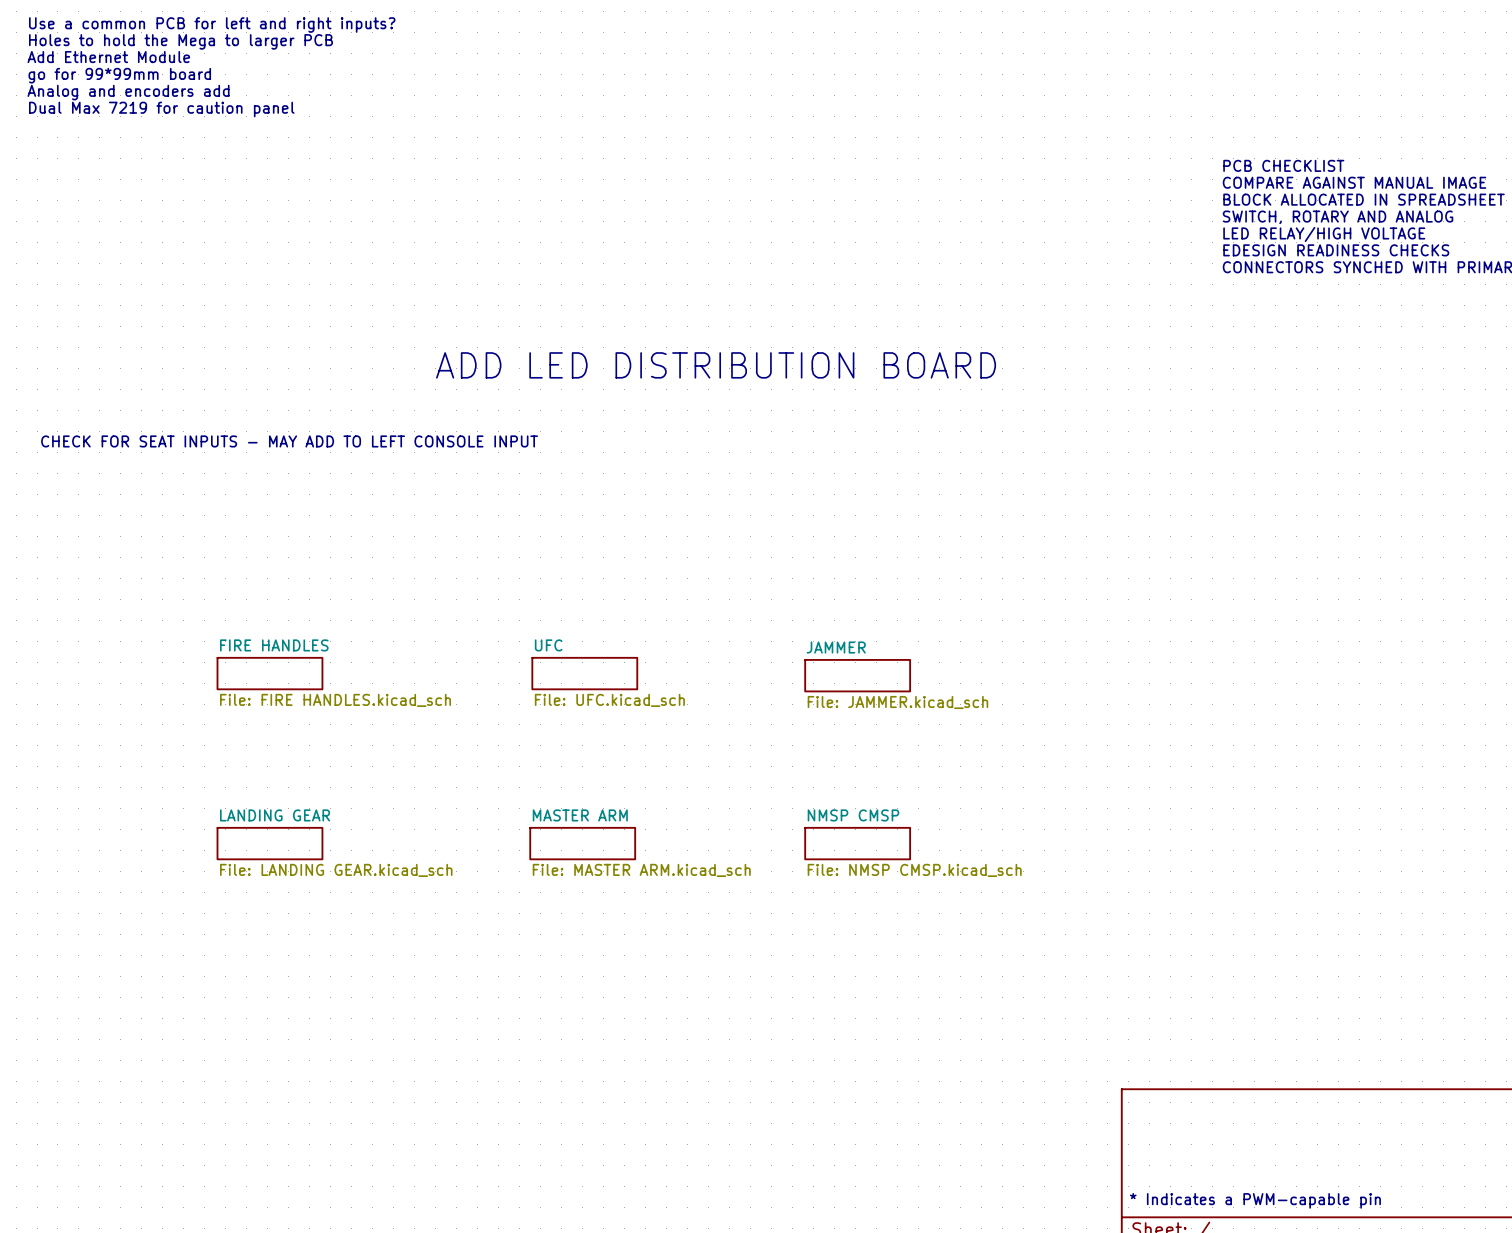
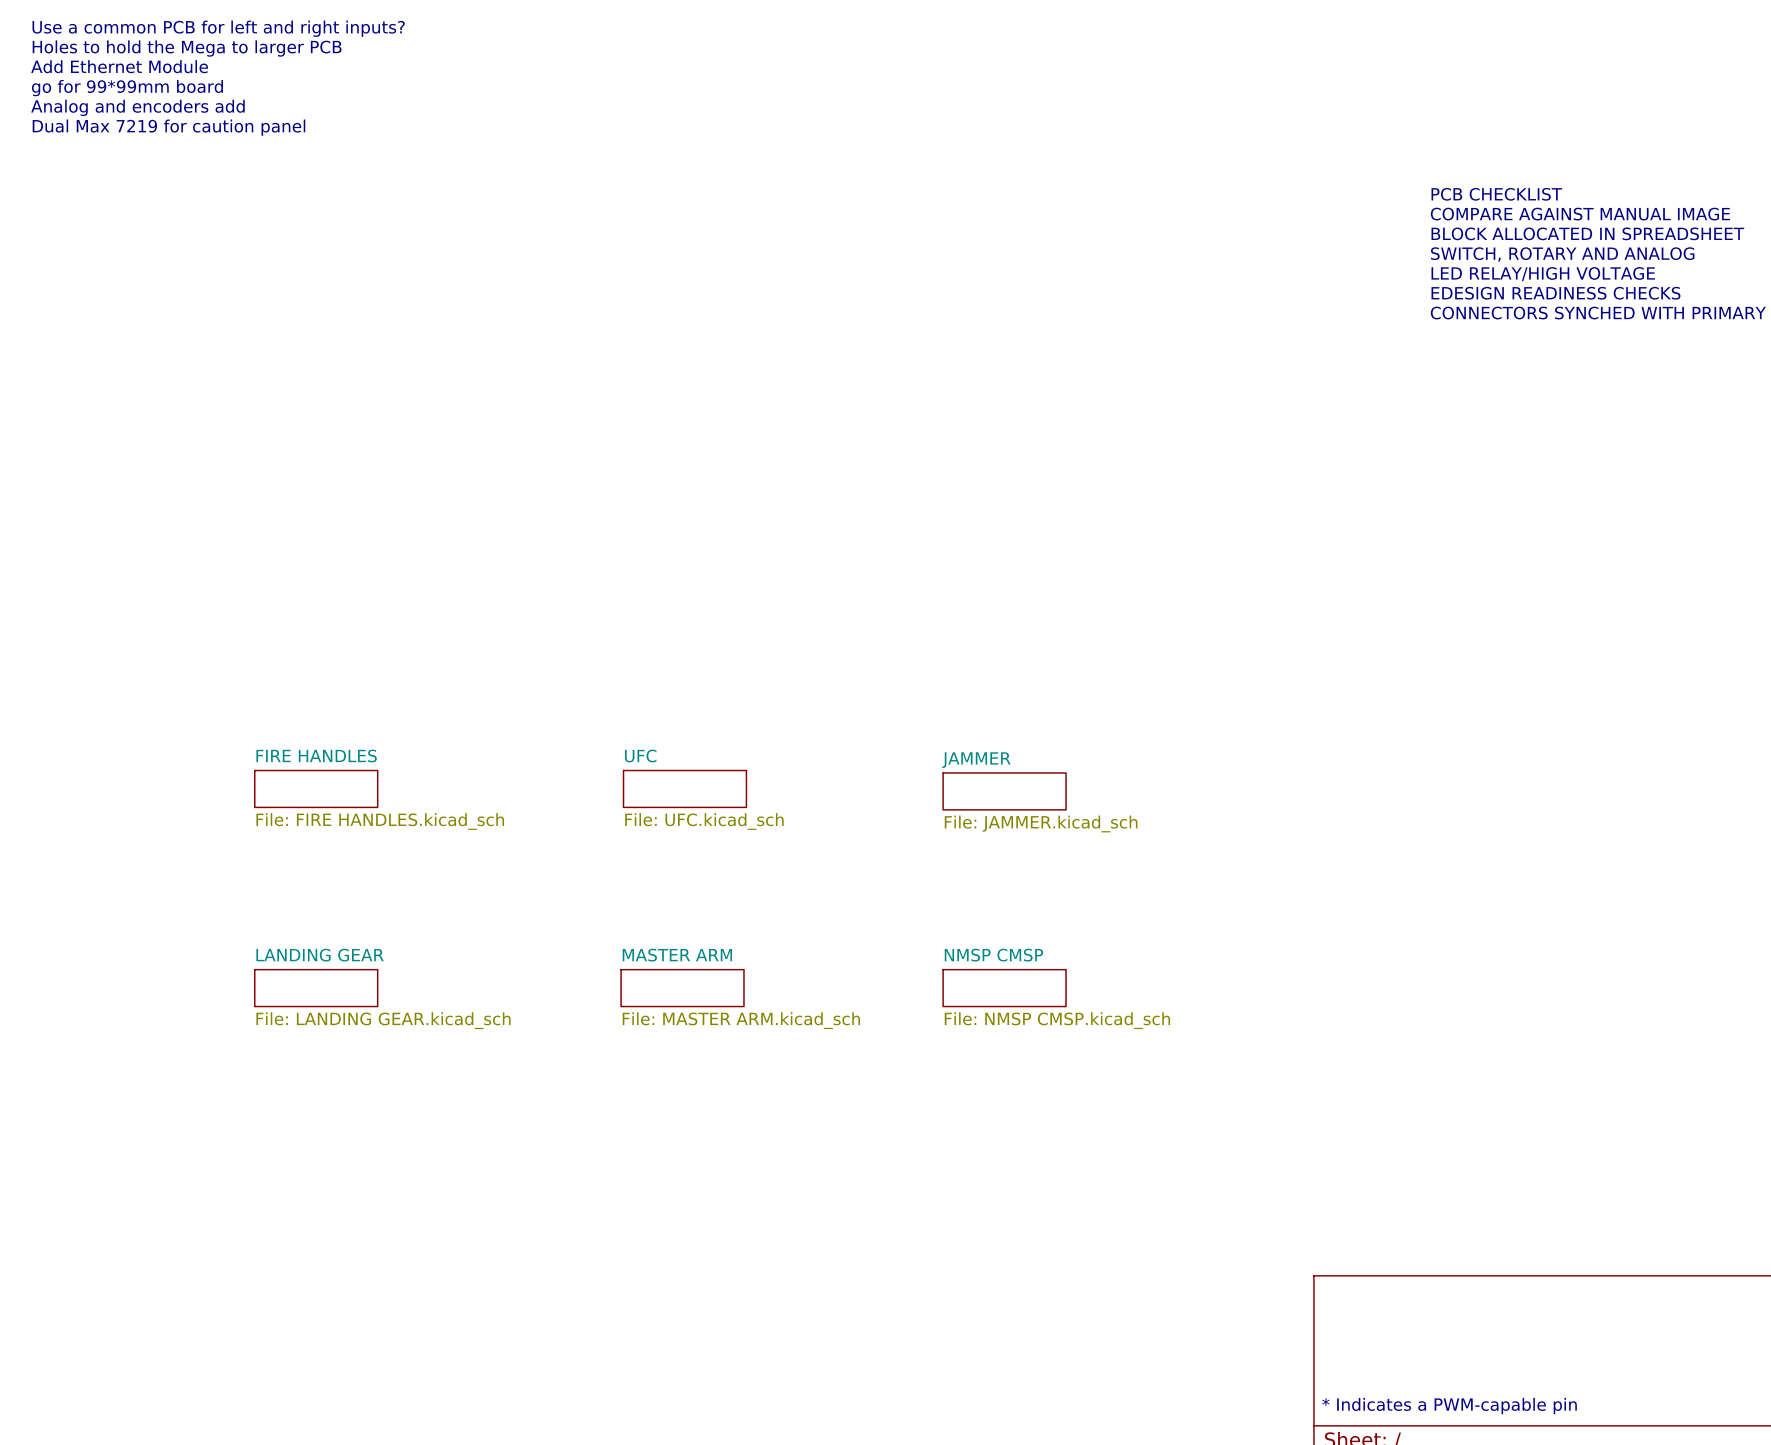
text: ADD LED DISTRIBUTION BOARD (716, 365) -> none
text: CHECK FOR SEAT INPUTS - MAY ADD TO LEFT CONSOLE INPUT (289, 441) -> none

